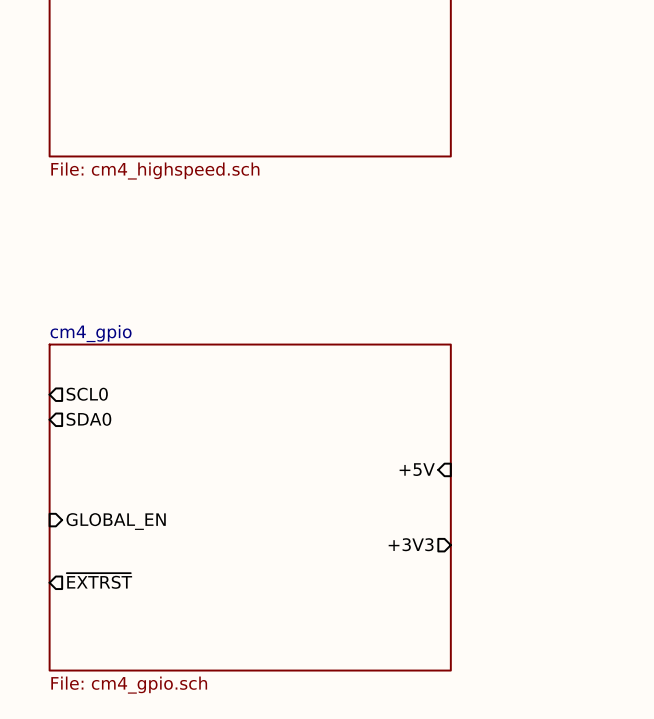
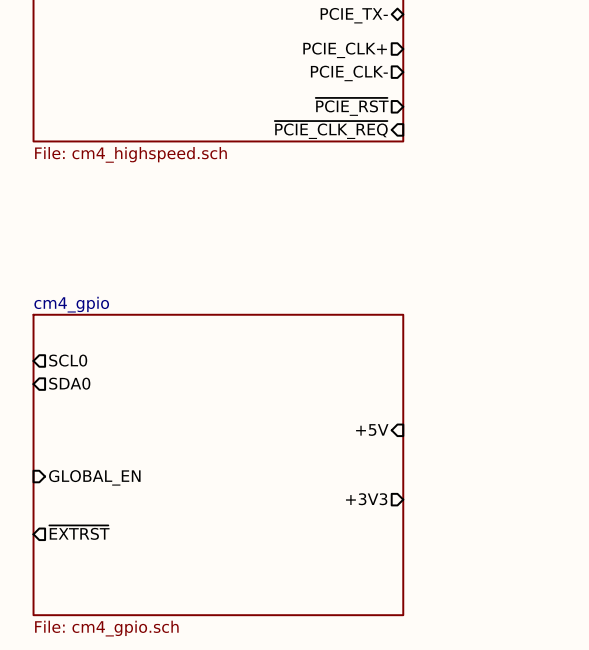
sheet pin: none -> PCIE_TX- (354, 15)
sheet pin: none -> PCIE_CLK+ (345, 50)
sheet pin: none -> PCIE_CLK- (349, 73)
sheet pin: none -> ~{PCIE_RST} (352, 106)
sheet pin: none -> ~{PCIE_CLK_REQ} (331, 130)

